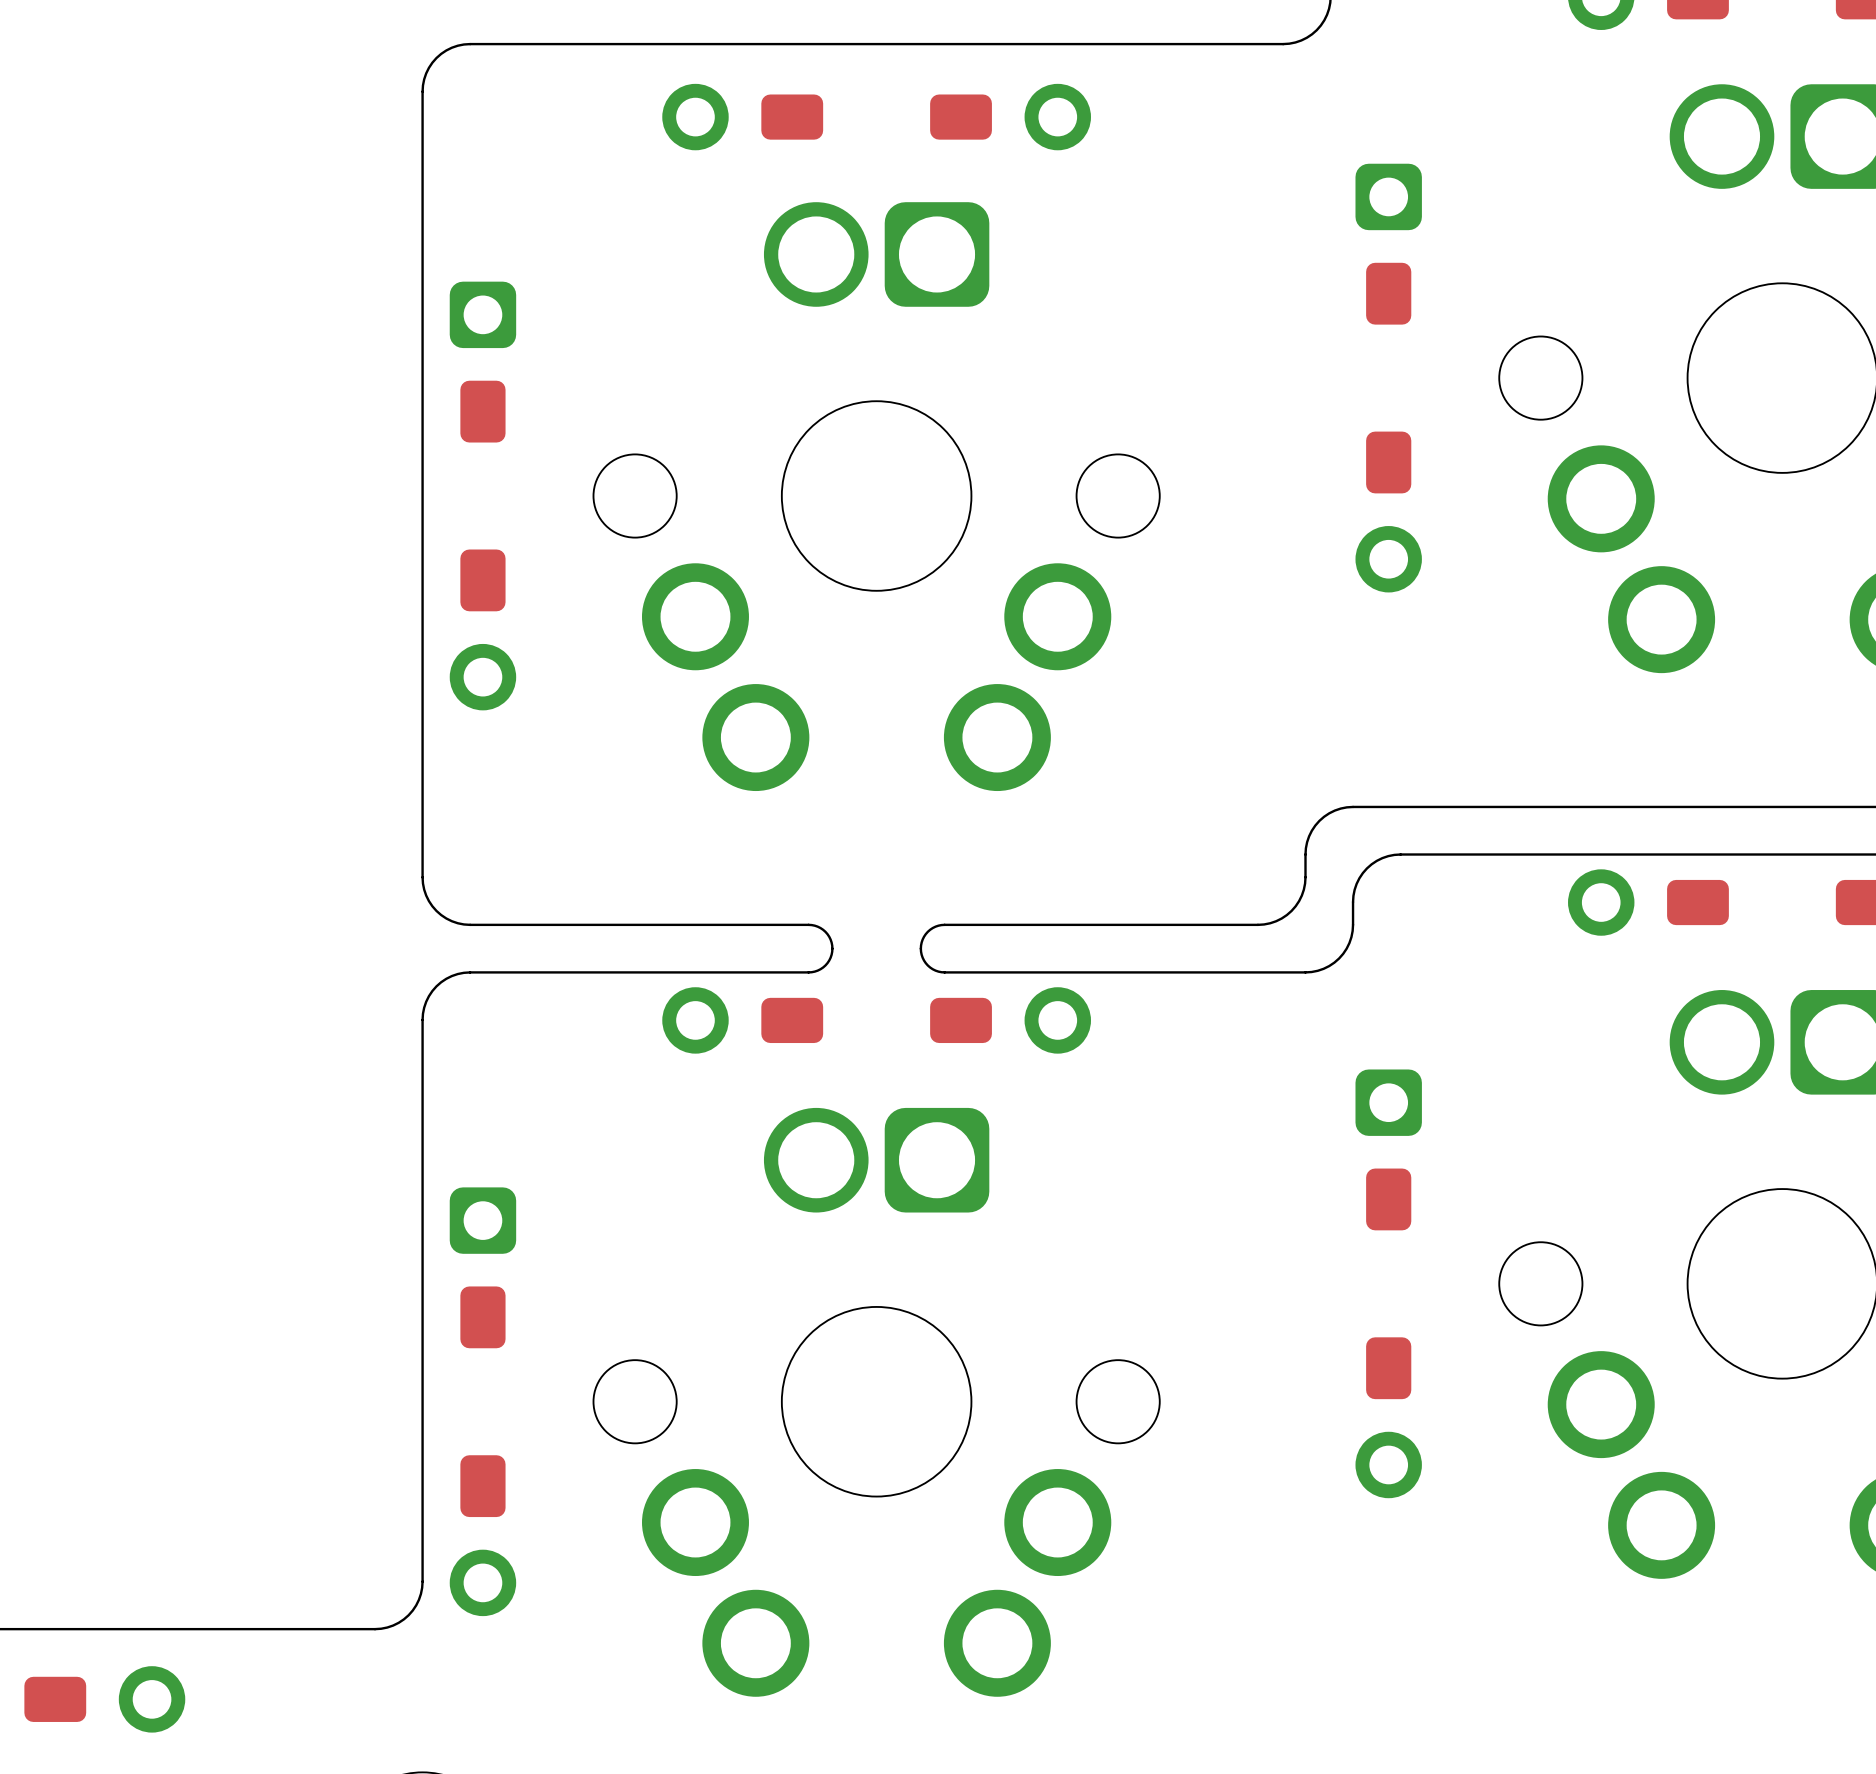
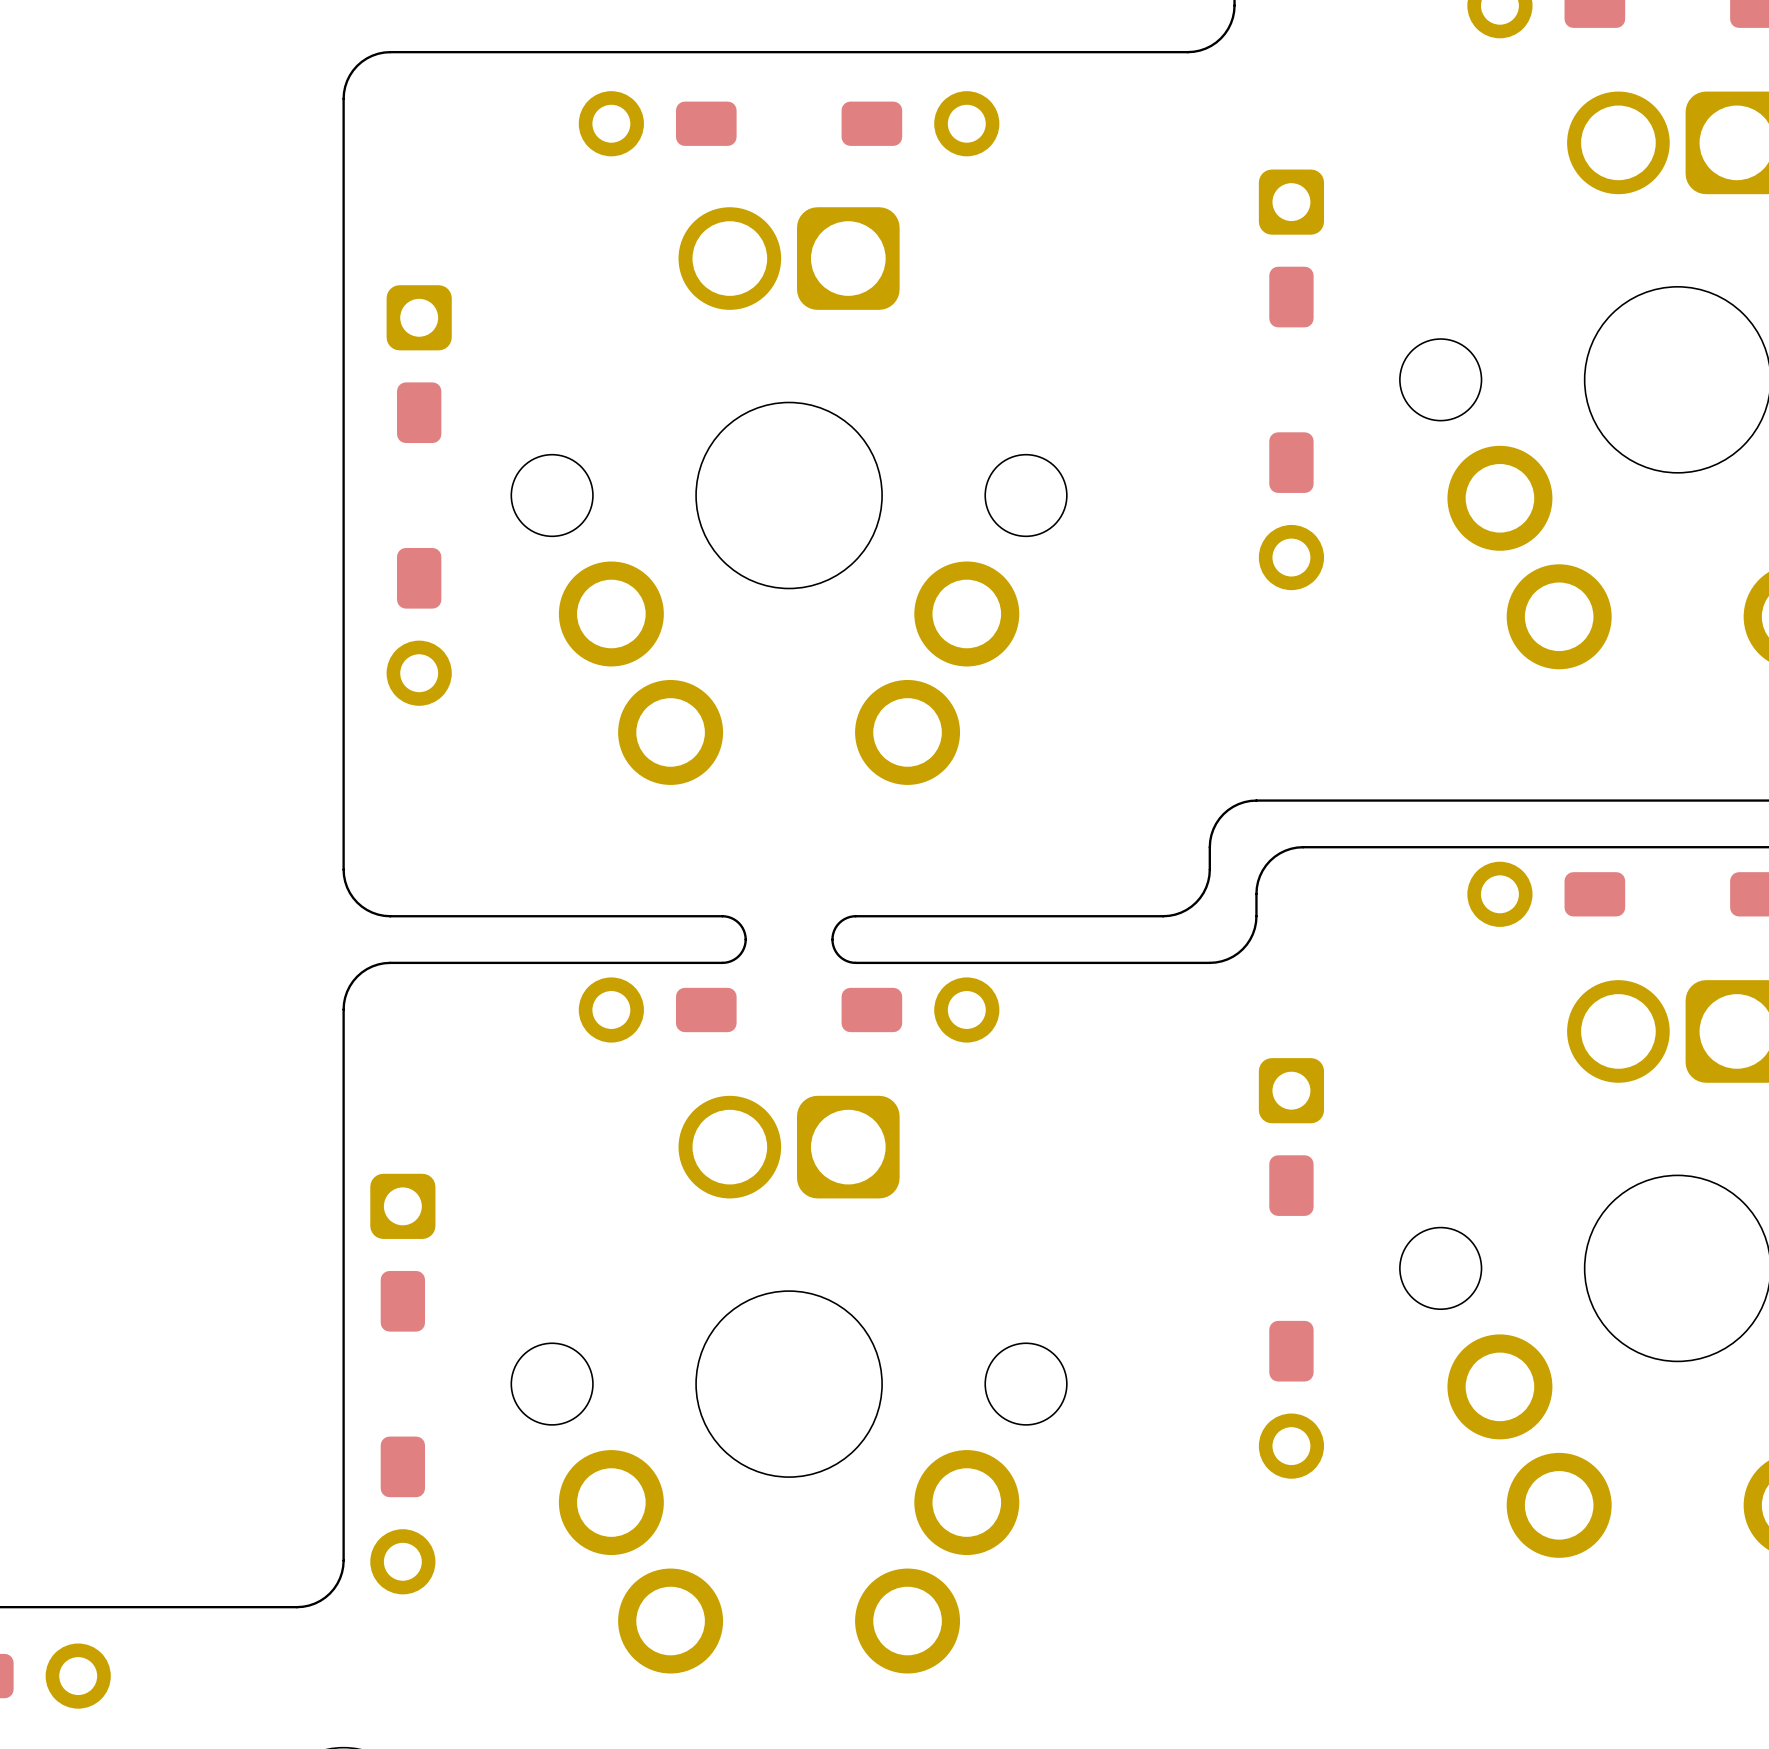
part position: (482, 496) -> (419, 495)

